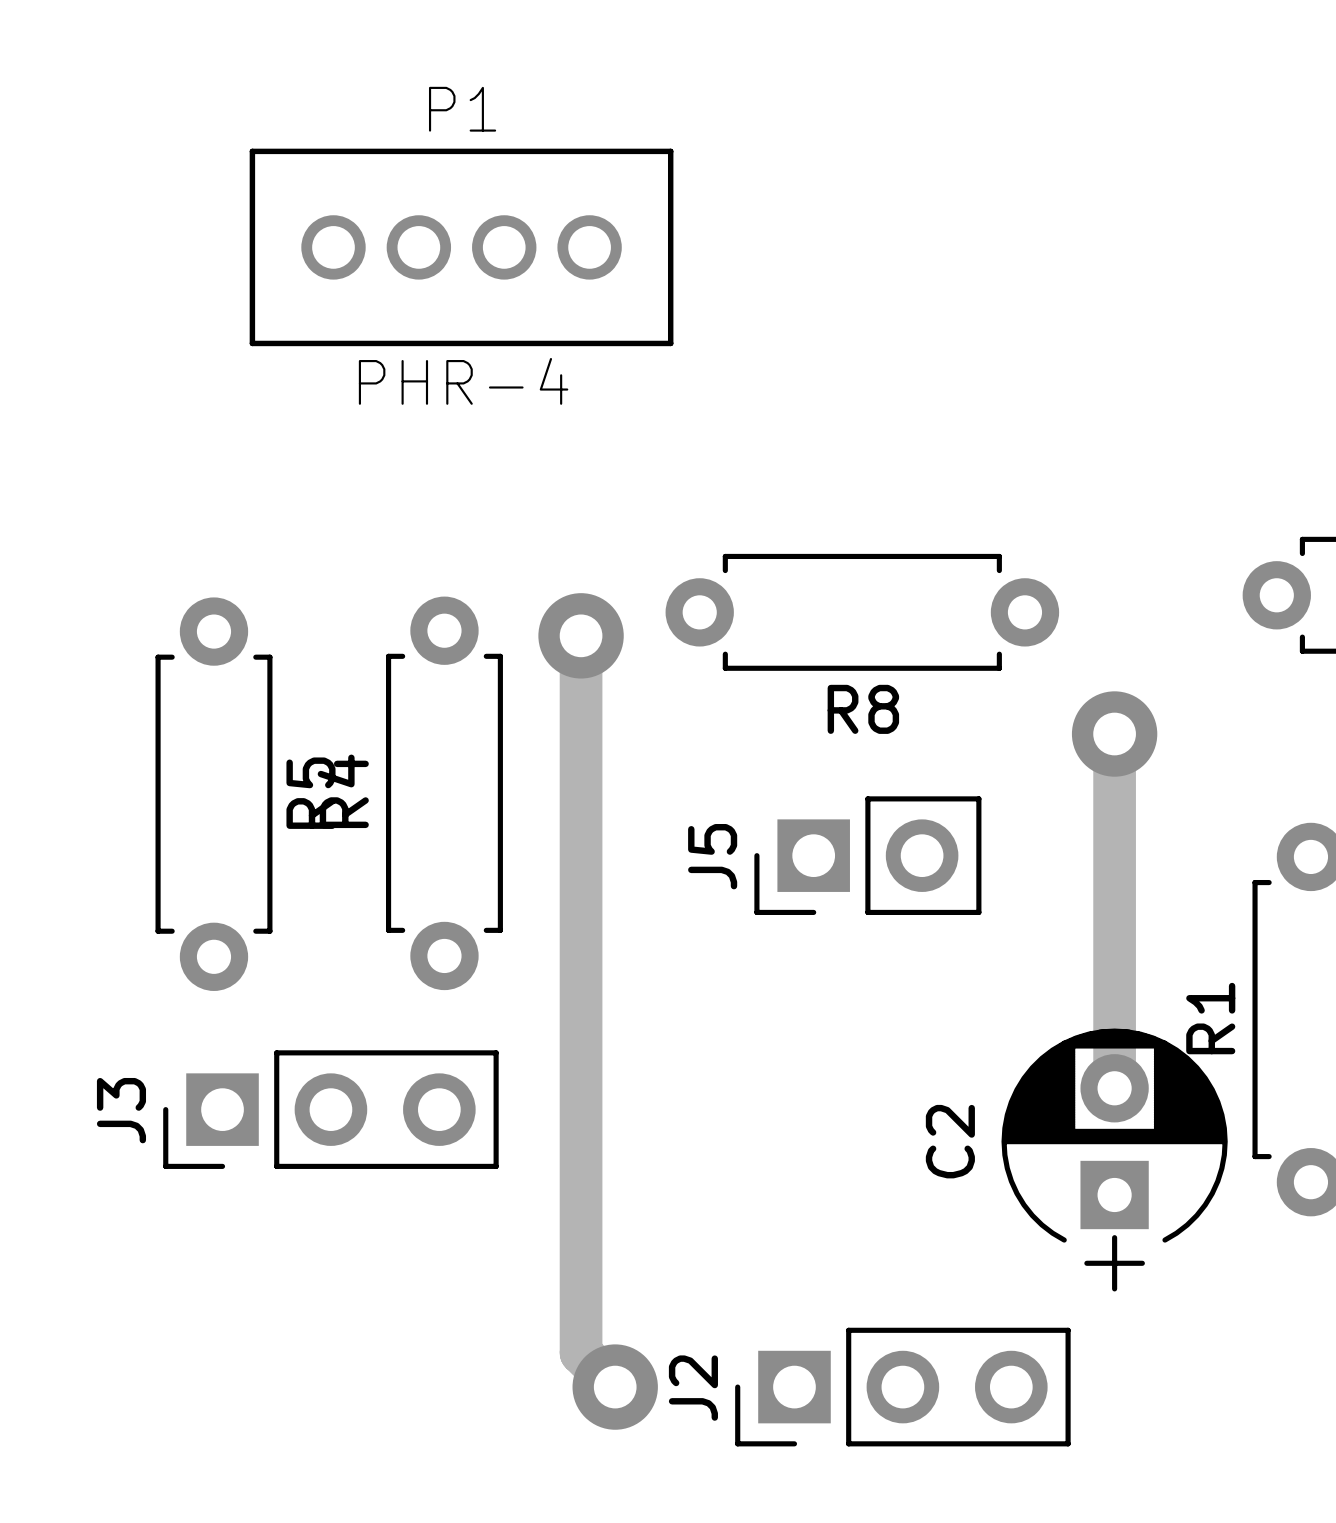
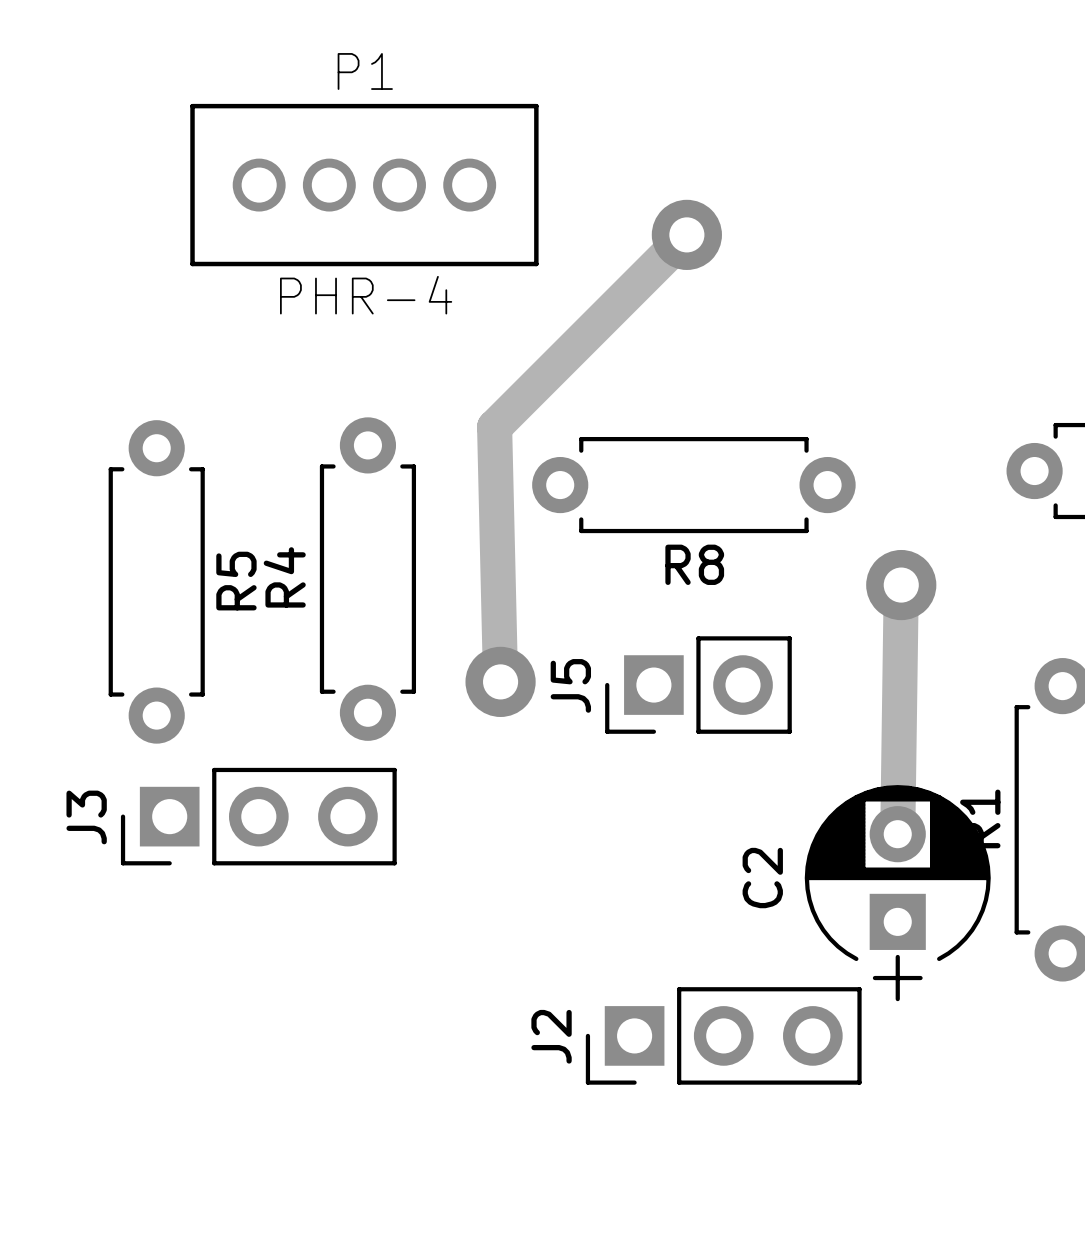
track: none -> (686, 234) (494, 427) (500, 681)
via: none -> (686, 234)
track: (581, 635) (581, 1352) (615, 1387) -> none
via: (581, 635) -> none
track: (1114, 734) (1114, 1088) -> (901, 585) (897, 834)
R4 position: (444, 793) -> (367, 579)
R5 position: (213, 794) -> (156, 581)
via: none -> (500, 681)
J3 position: (330, 1109) -> (258, 816)
C2 position: (1114, 1159) -> (897, 893)
via: (615, 1387) -> none
J2 position: (902, 1387) -> (723, 1035)

